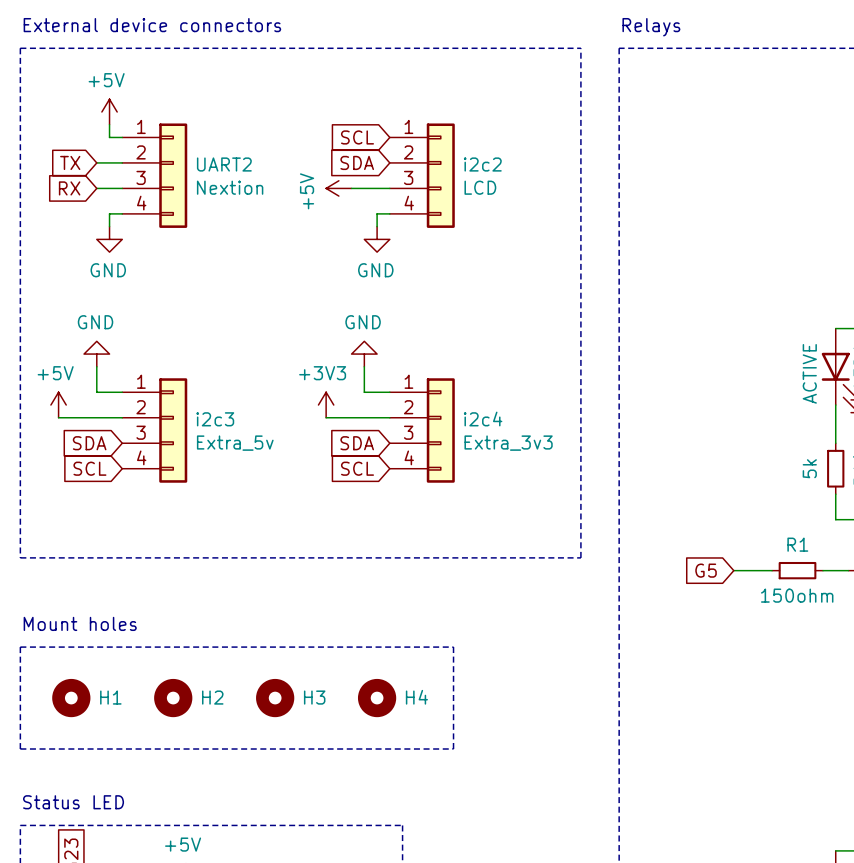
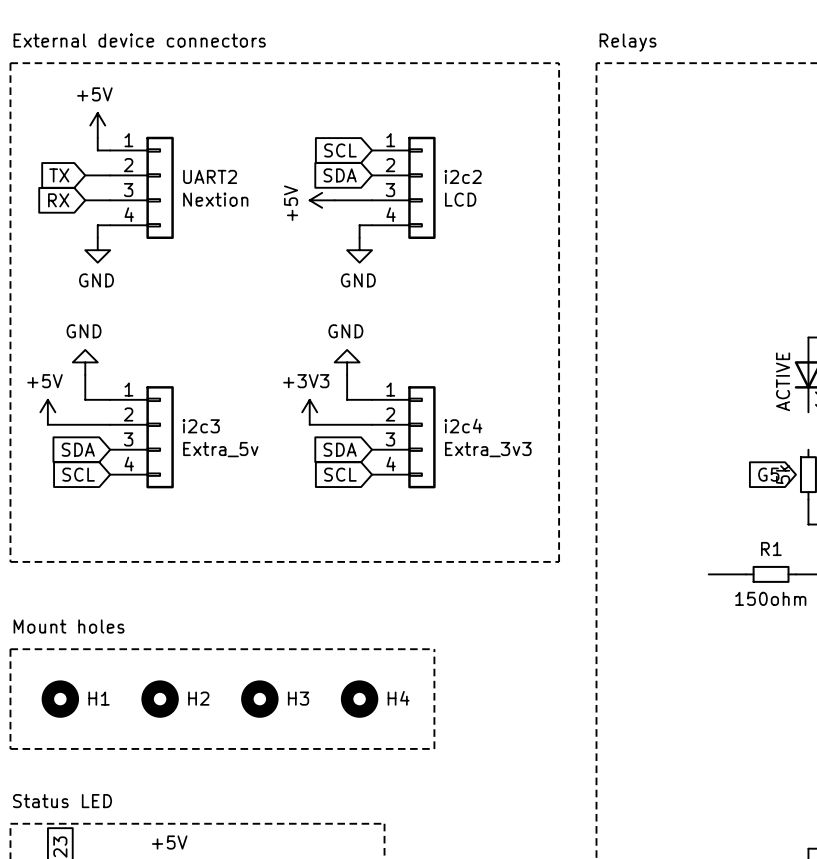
wire: (835, 405) (835, 443) -> none
global label position: G5 (706, 570) -> G5 (768, 474)

